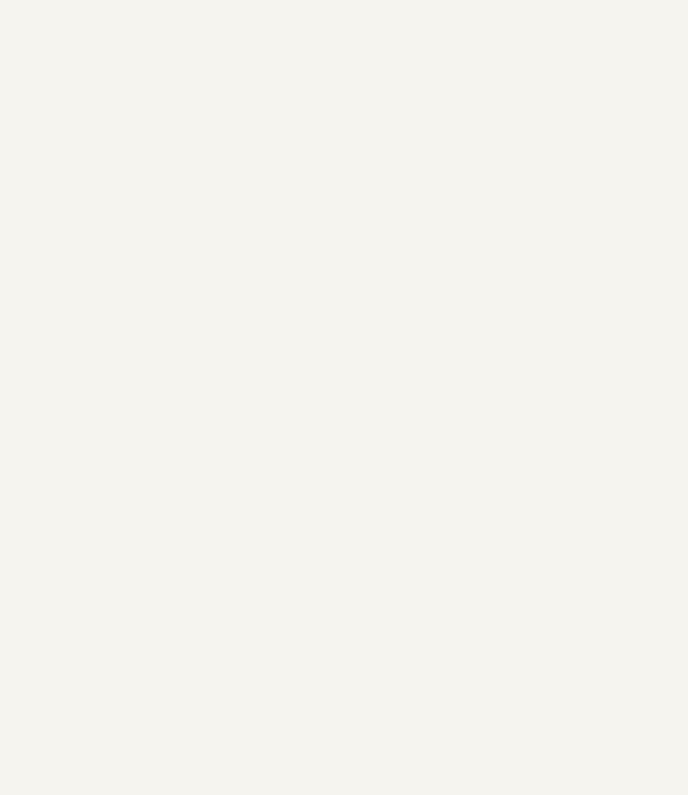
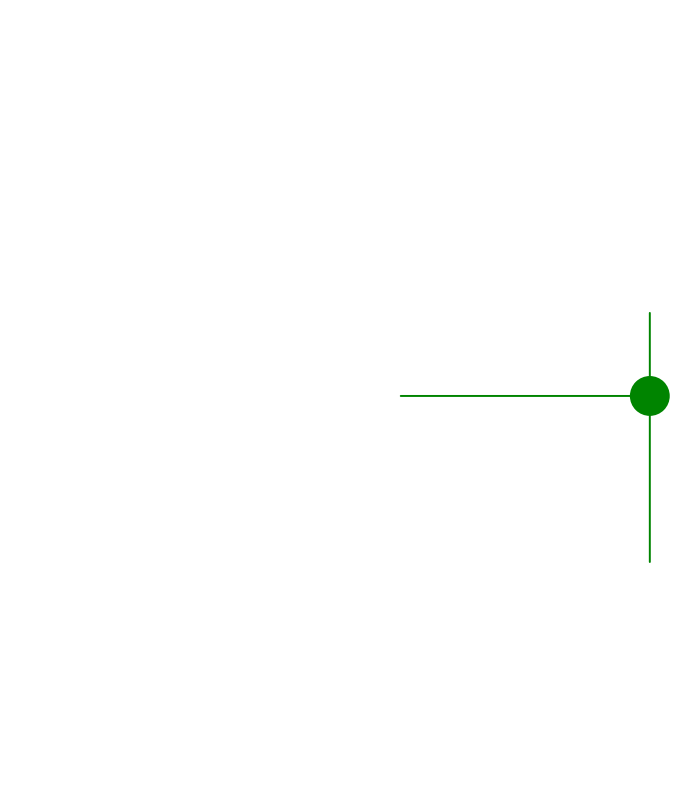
wire: none -> (649, 312) (649, 561)
wire: none -> (400, 395) (649, 395)
junction: none -> (649, 395)

